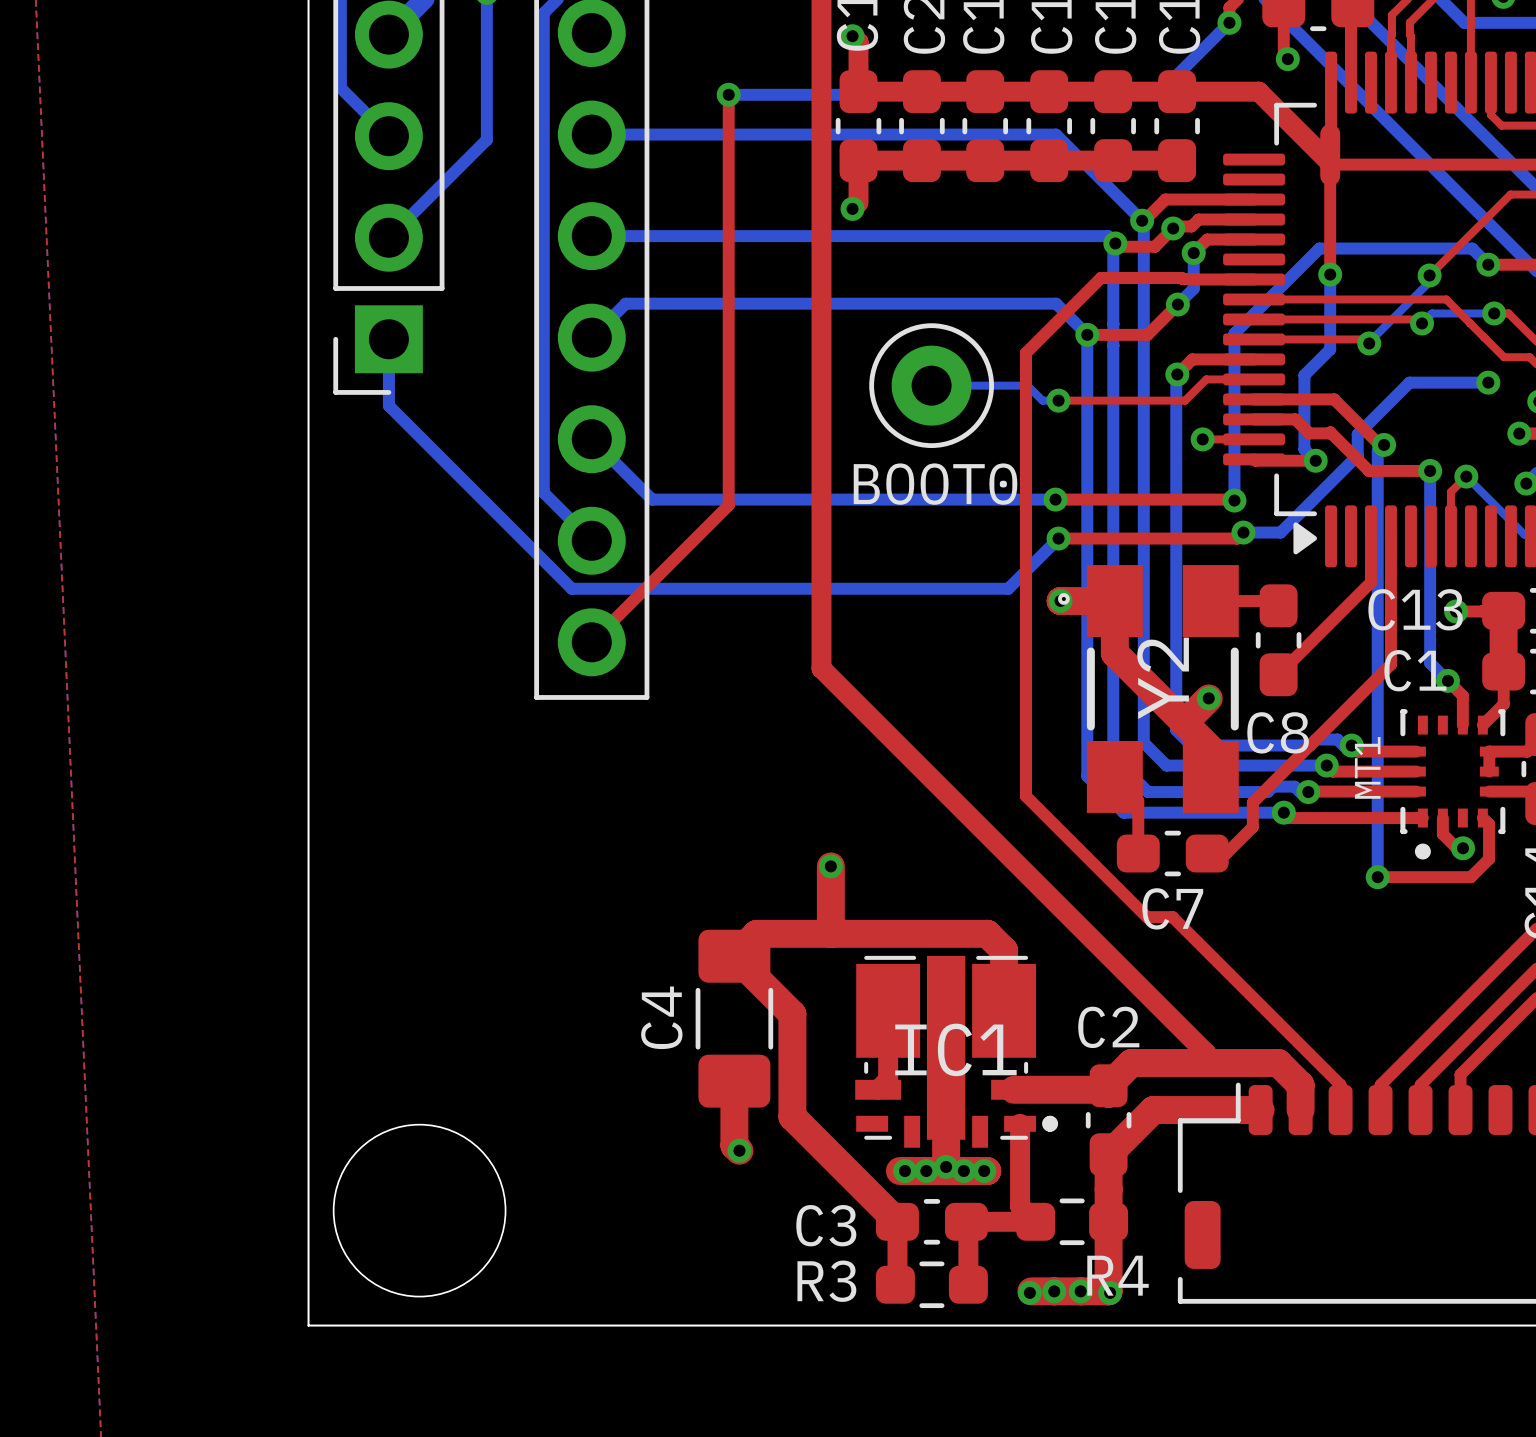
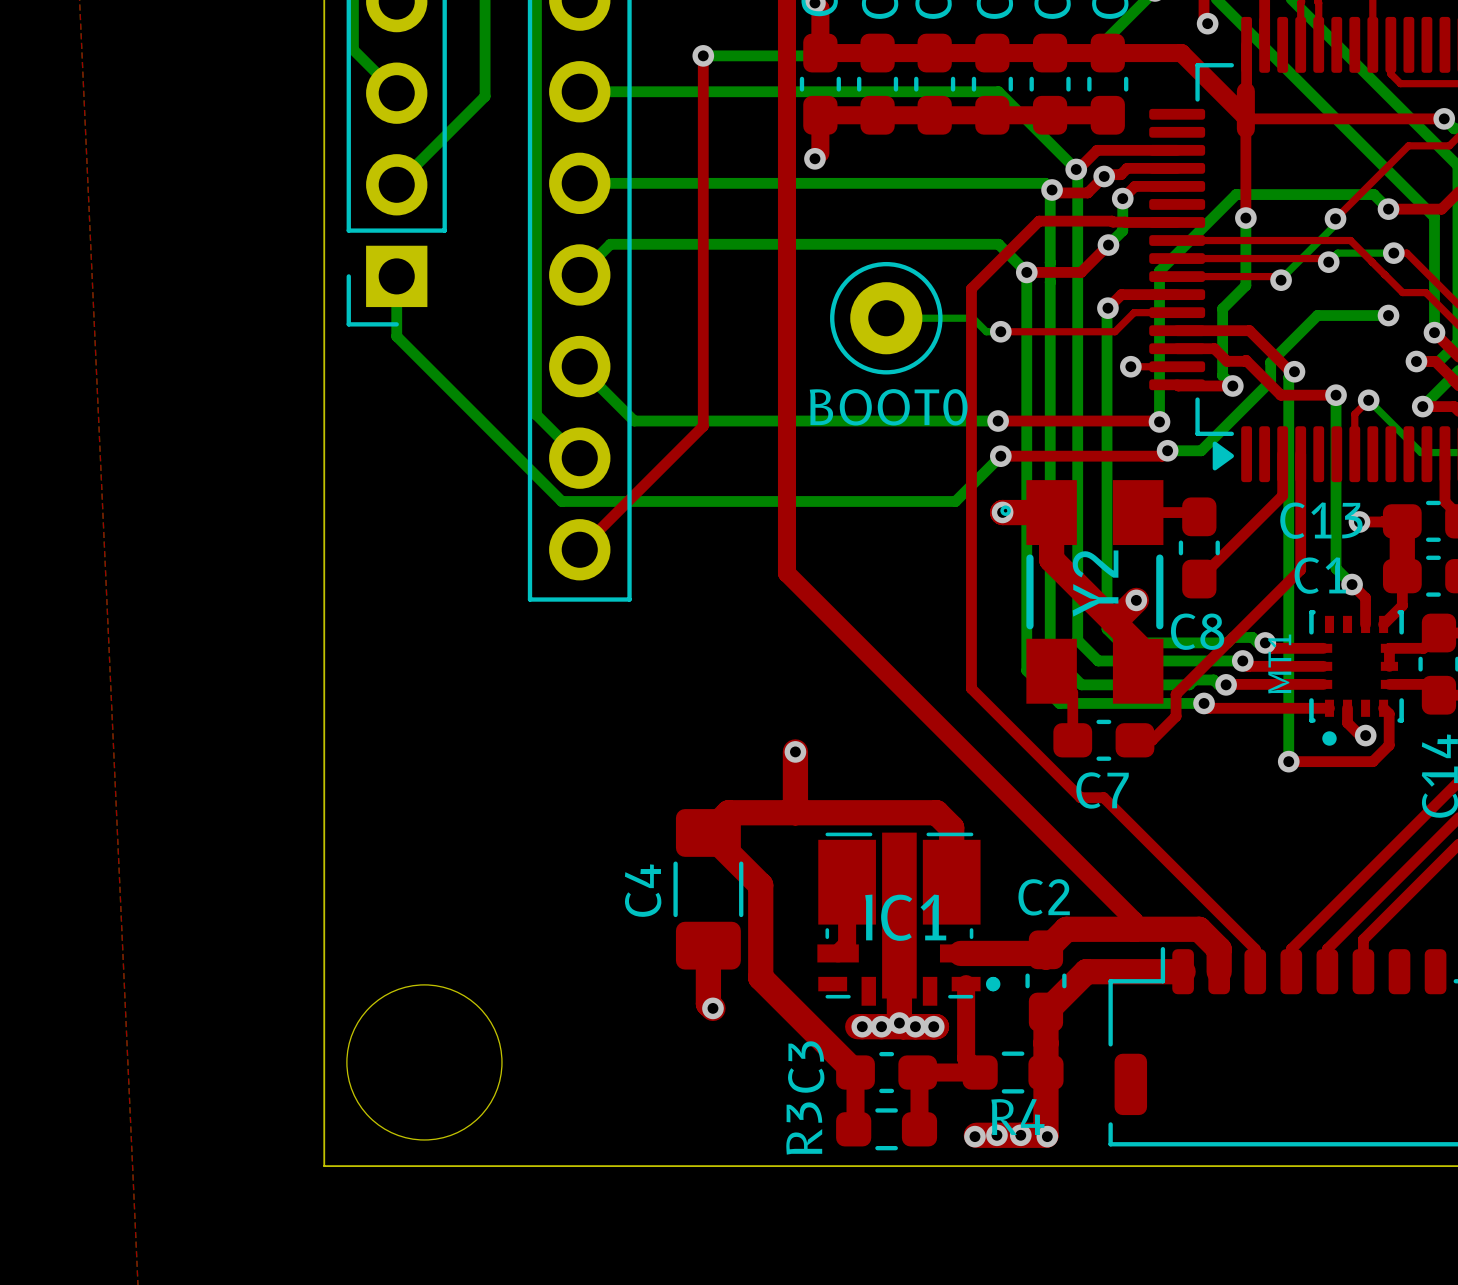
C3 name rotation: 0° (826, 1225) -> 90° counterclockwise (806, 1067)
R4 name position: R4 (1118, 1275) -> R4 (1017, 1116)
R3 name rotation: 0° (826, 1281) -> 90° counterclockwise (804, 1128)

